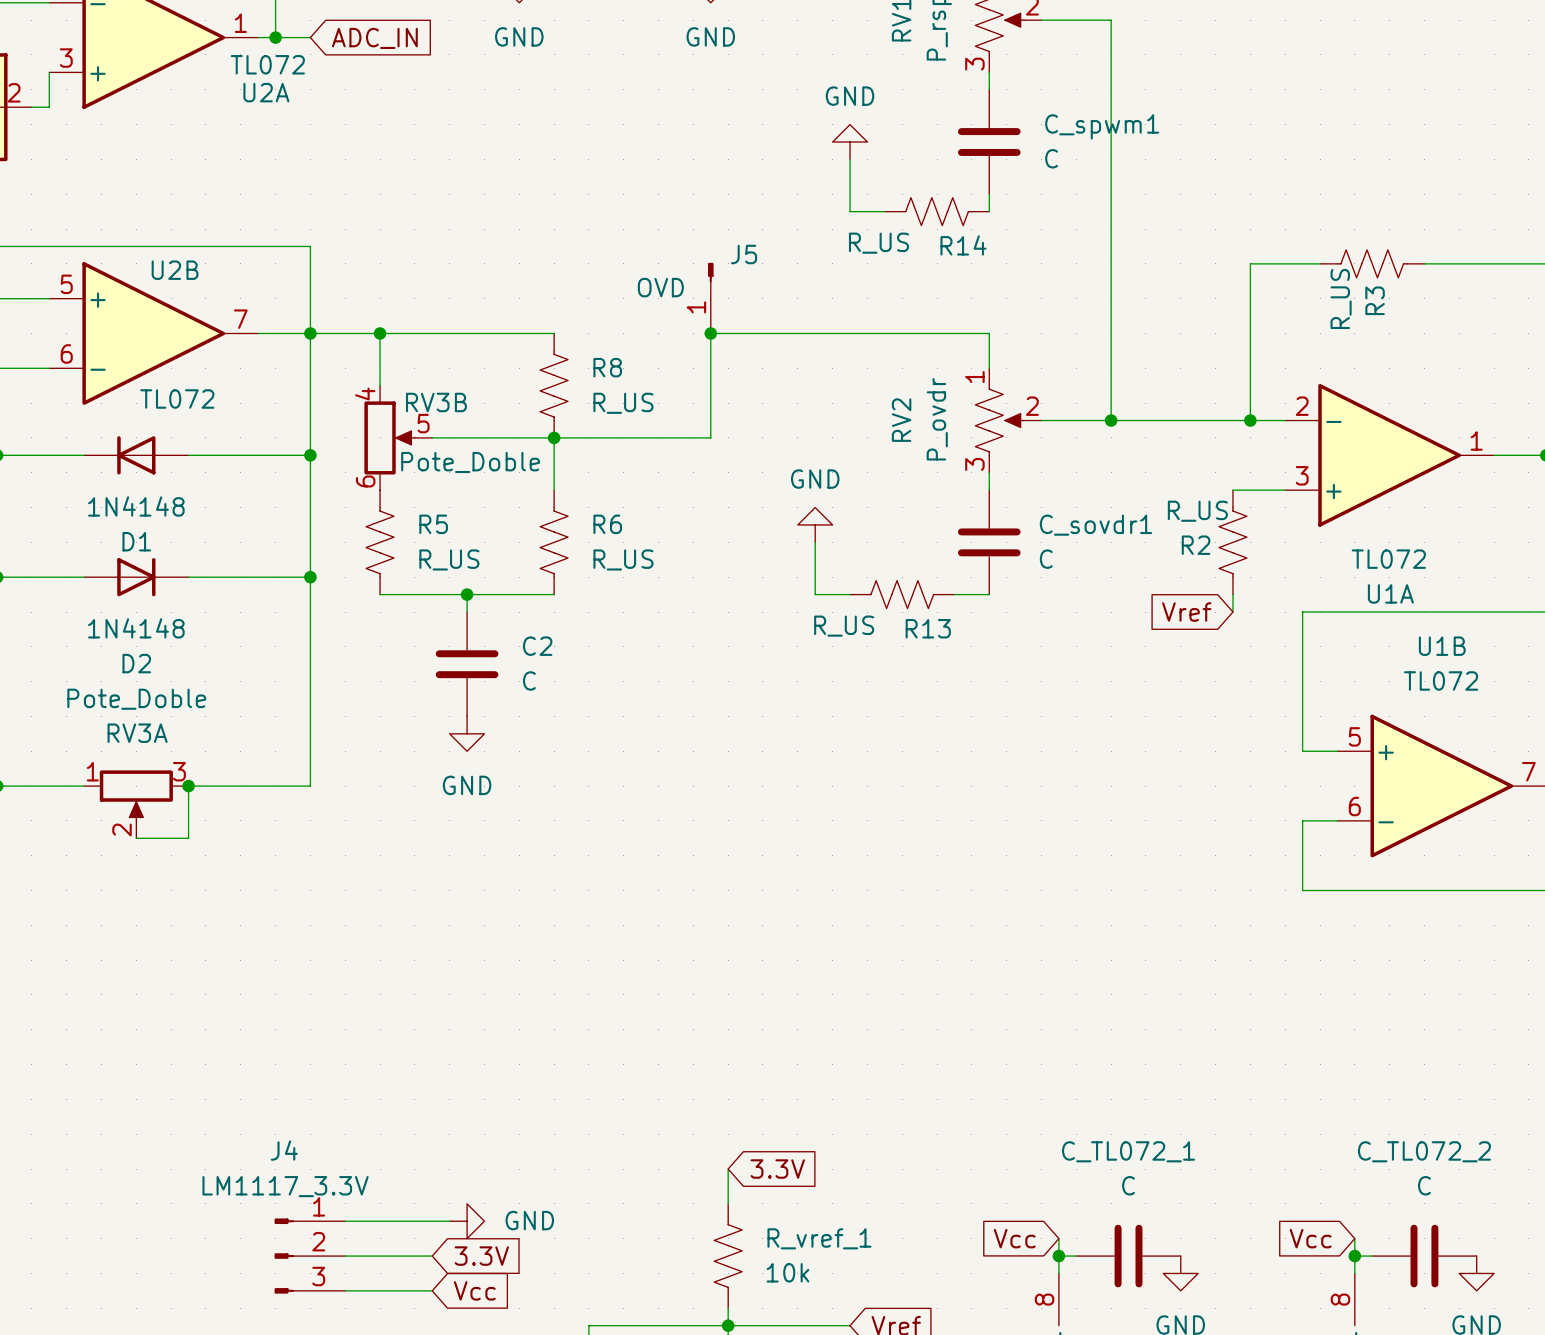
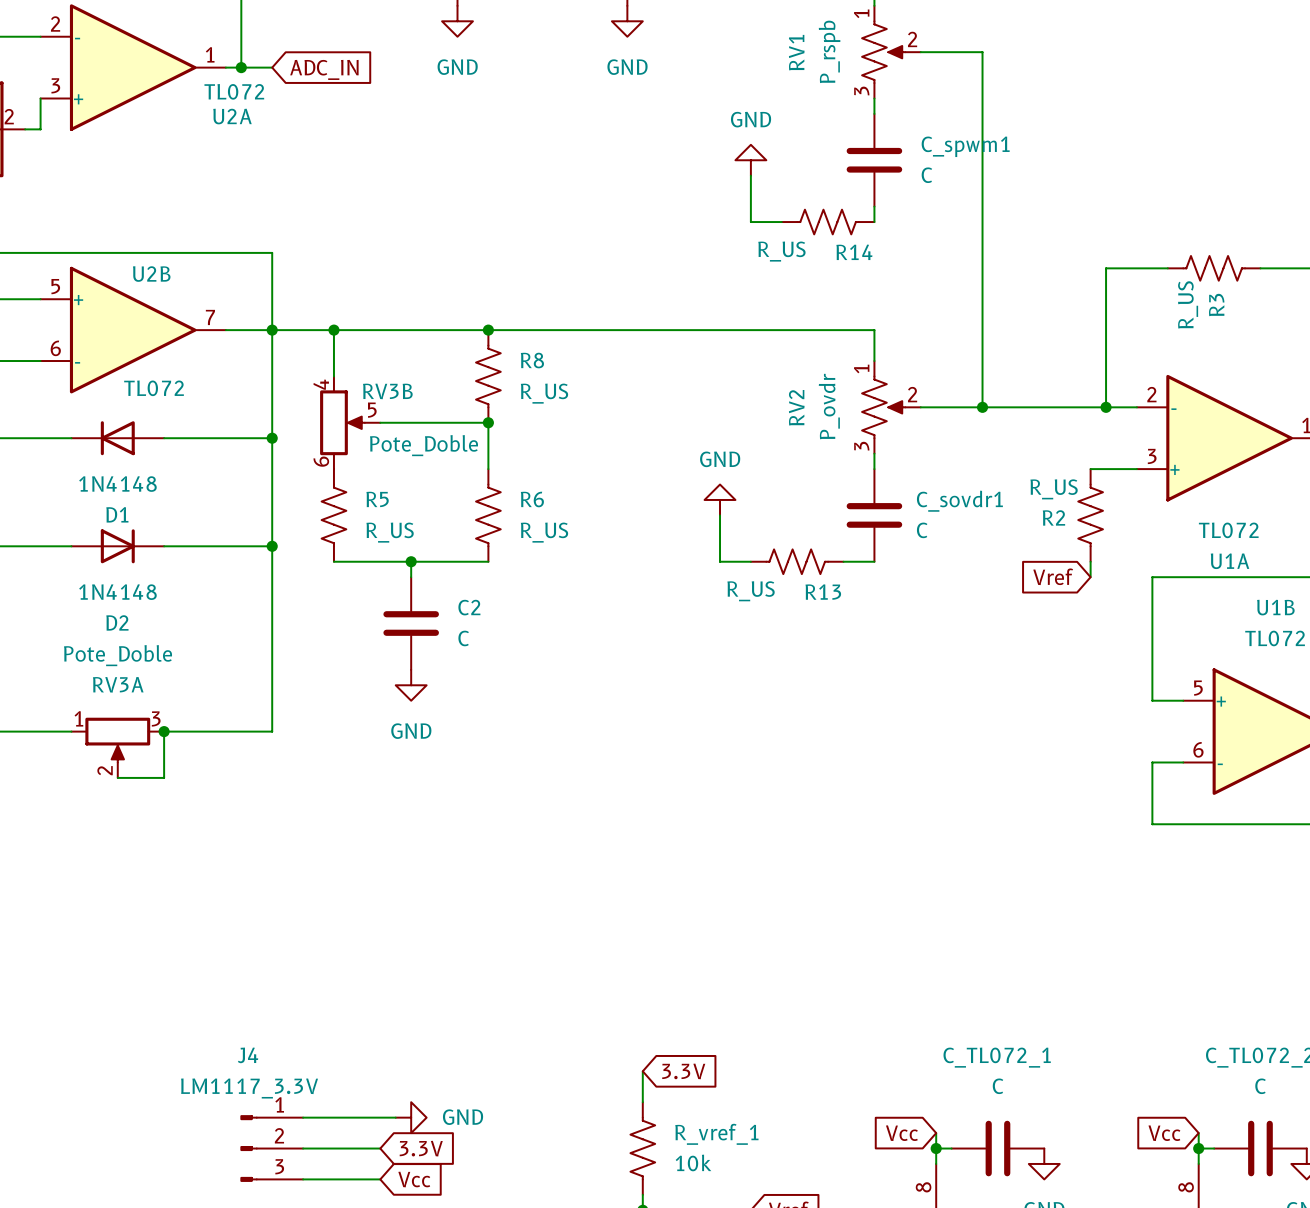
J5: OVD (710, 298) -> none
junction: none -> (488, 330)
wire: (710, 333) (710, 437) (554, 437) -> (627, 330) (488, 330)
junction: (710, 333) -> none

